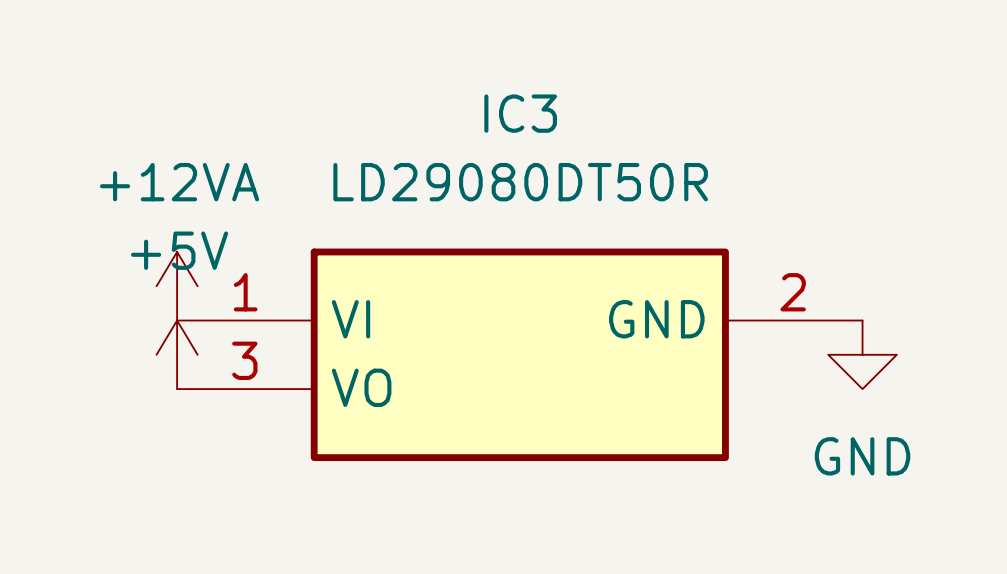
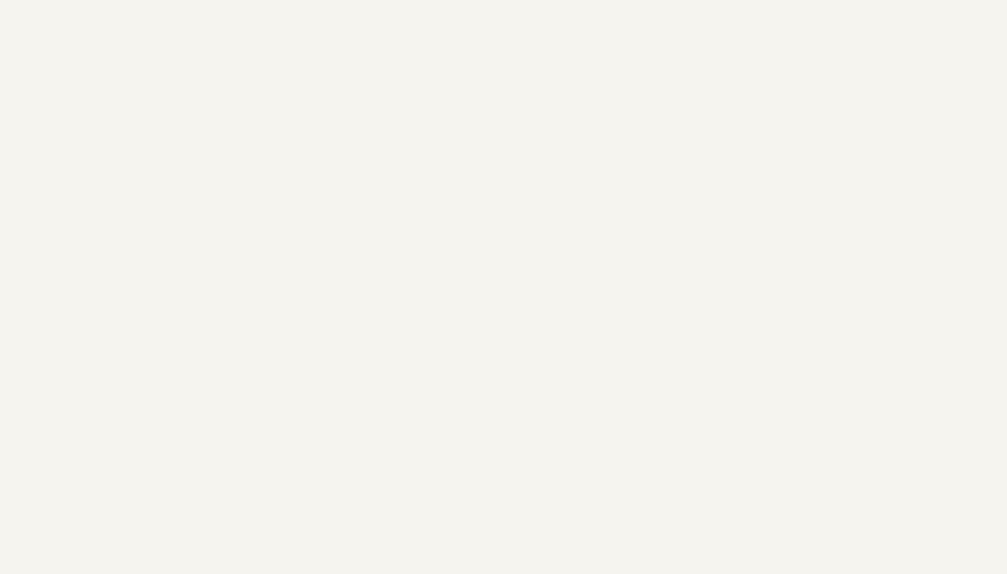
power symbol: +12VA (177, 286) -> none
power symbol: +5V (177, 354) -> none
IC3: LD29080DT50R (519, 354) -> none
power symbol: GND (862, 354) -> none

